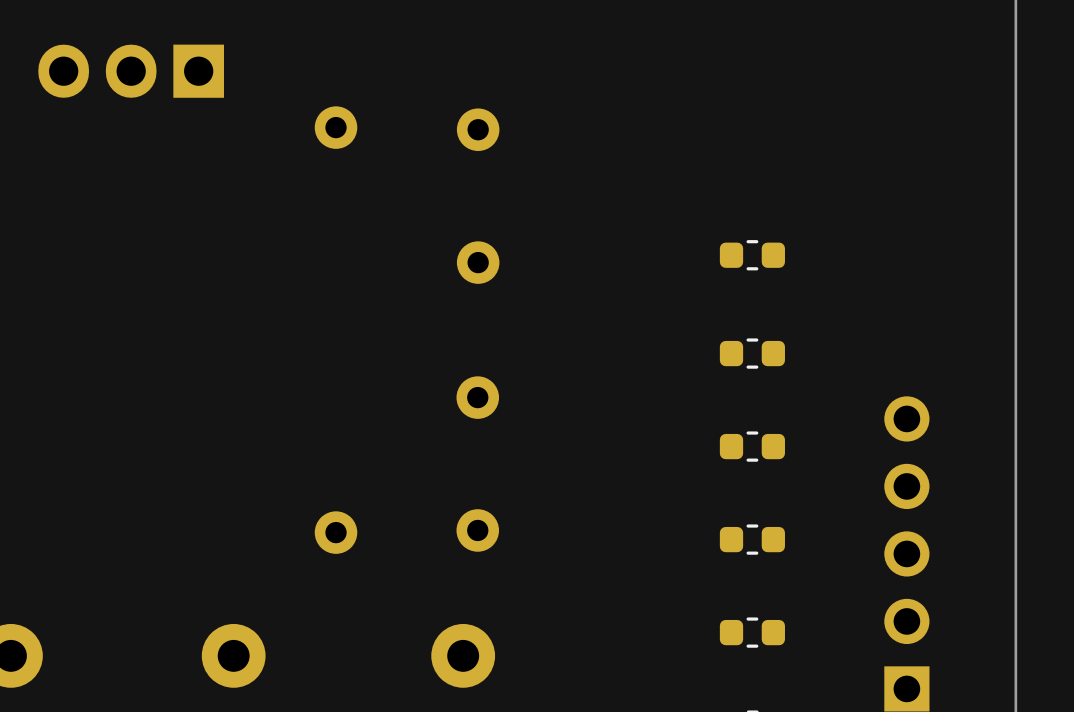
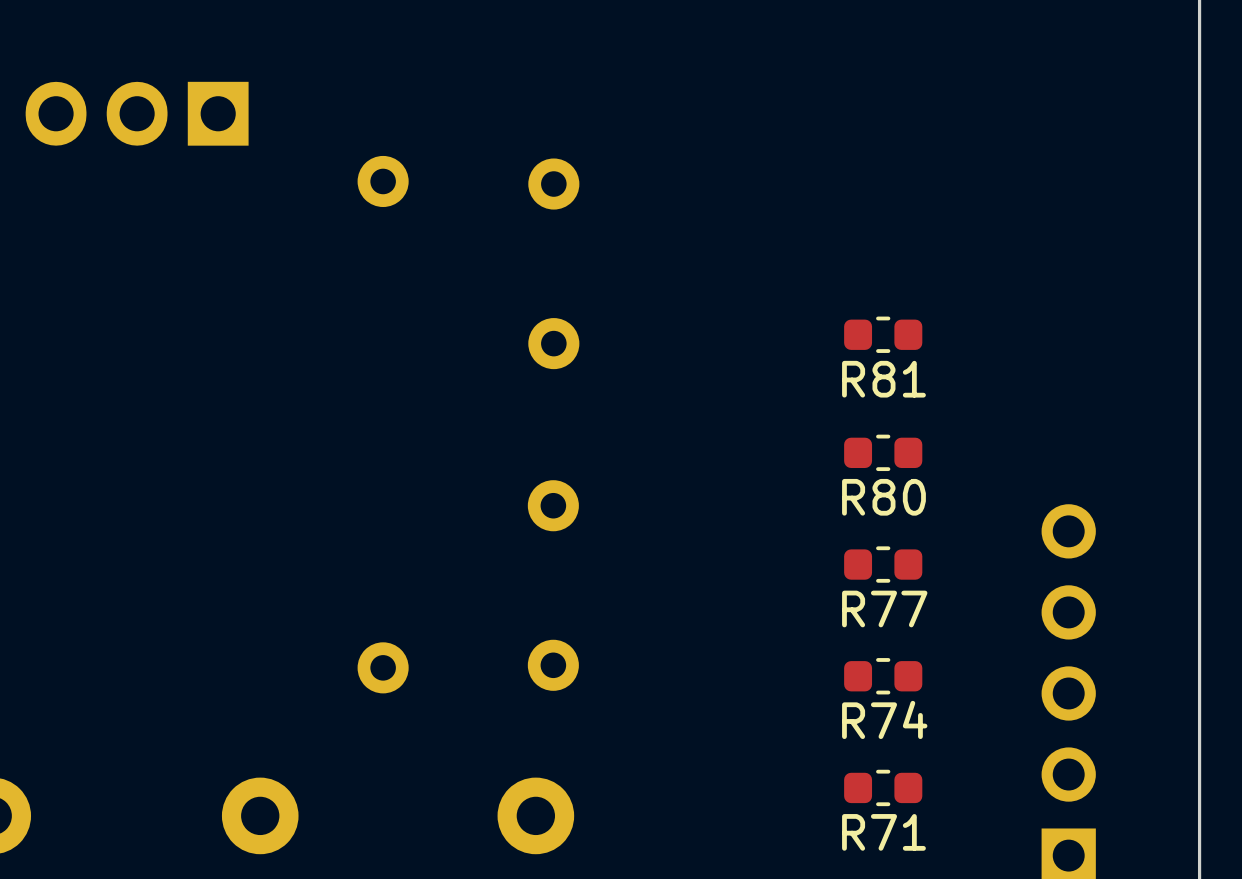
R81 name: none -> R81 (883, 379)
R80 name: none -> R80 (883, 497)
R77 name: none -> R77 (884, 608)
R74 name: none -> R74 (884, 719)
R71 name: none -> R71 (883, 832)

